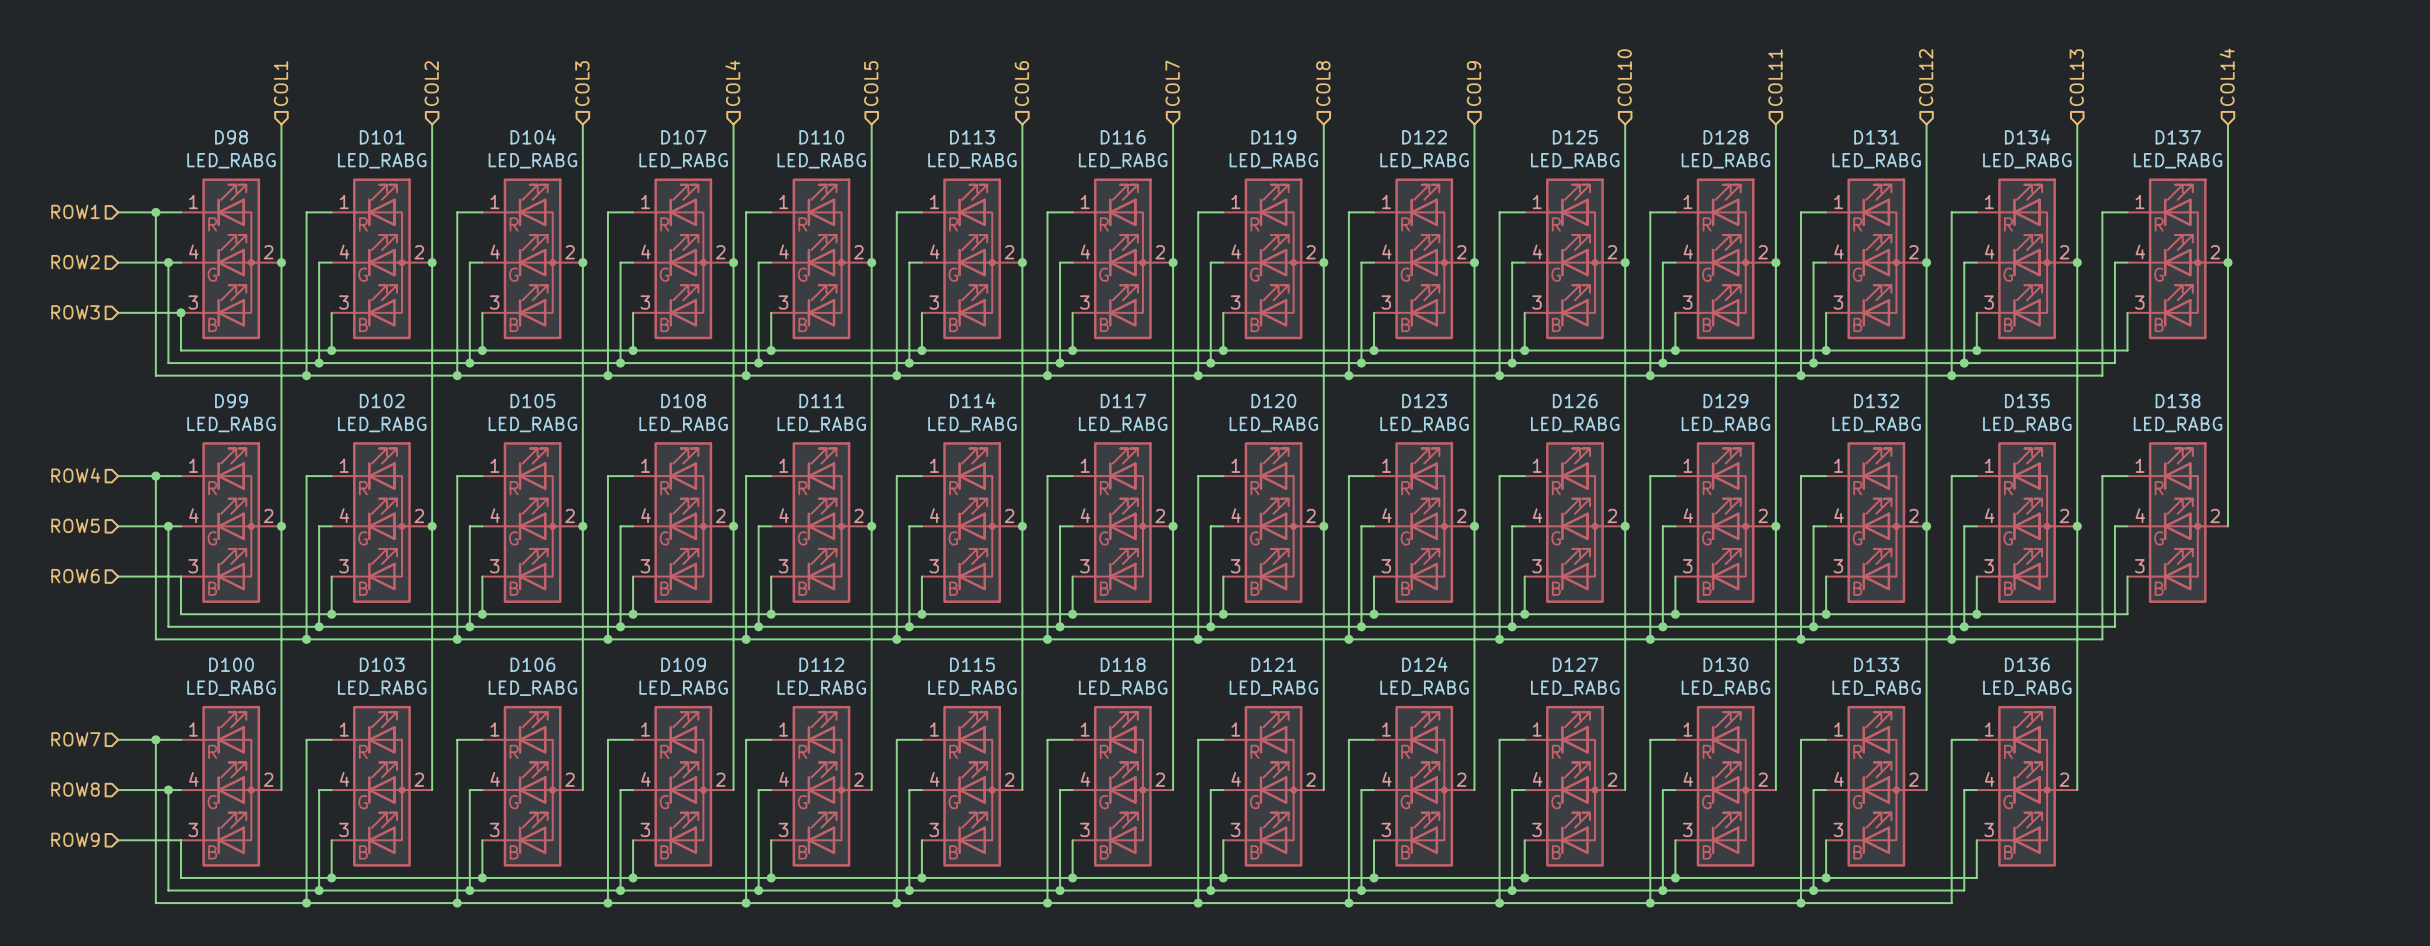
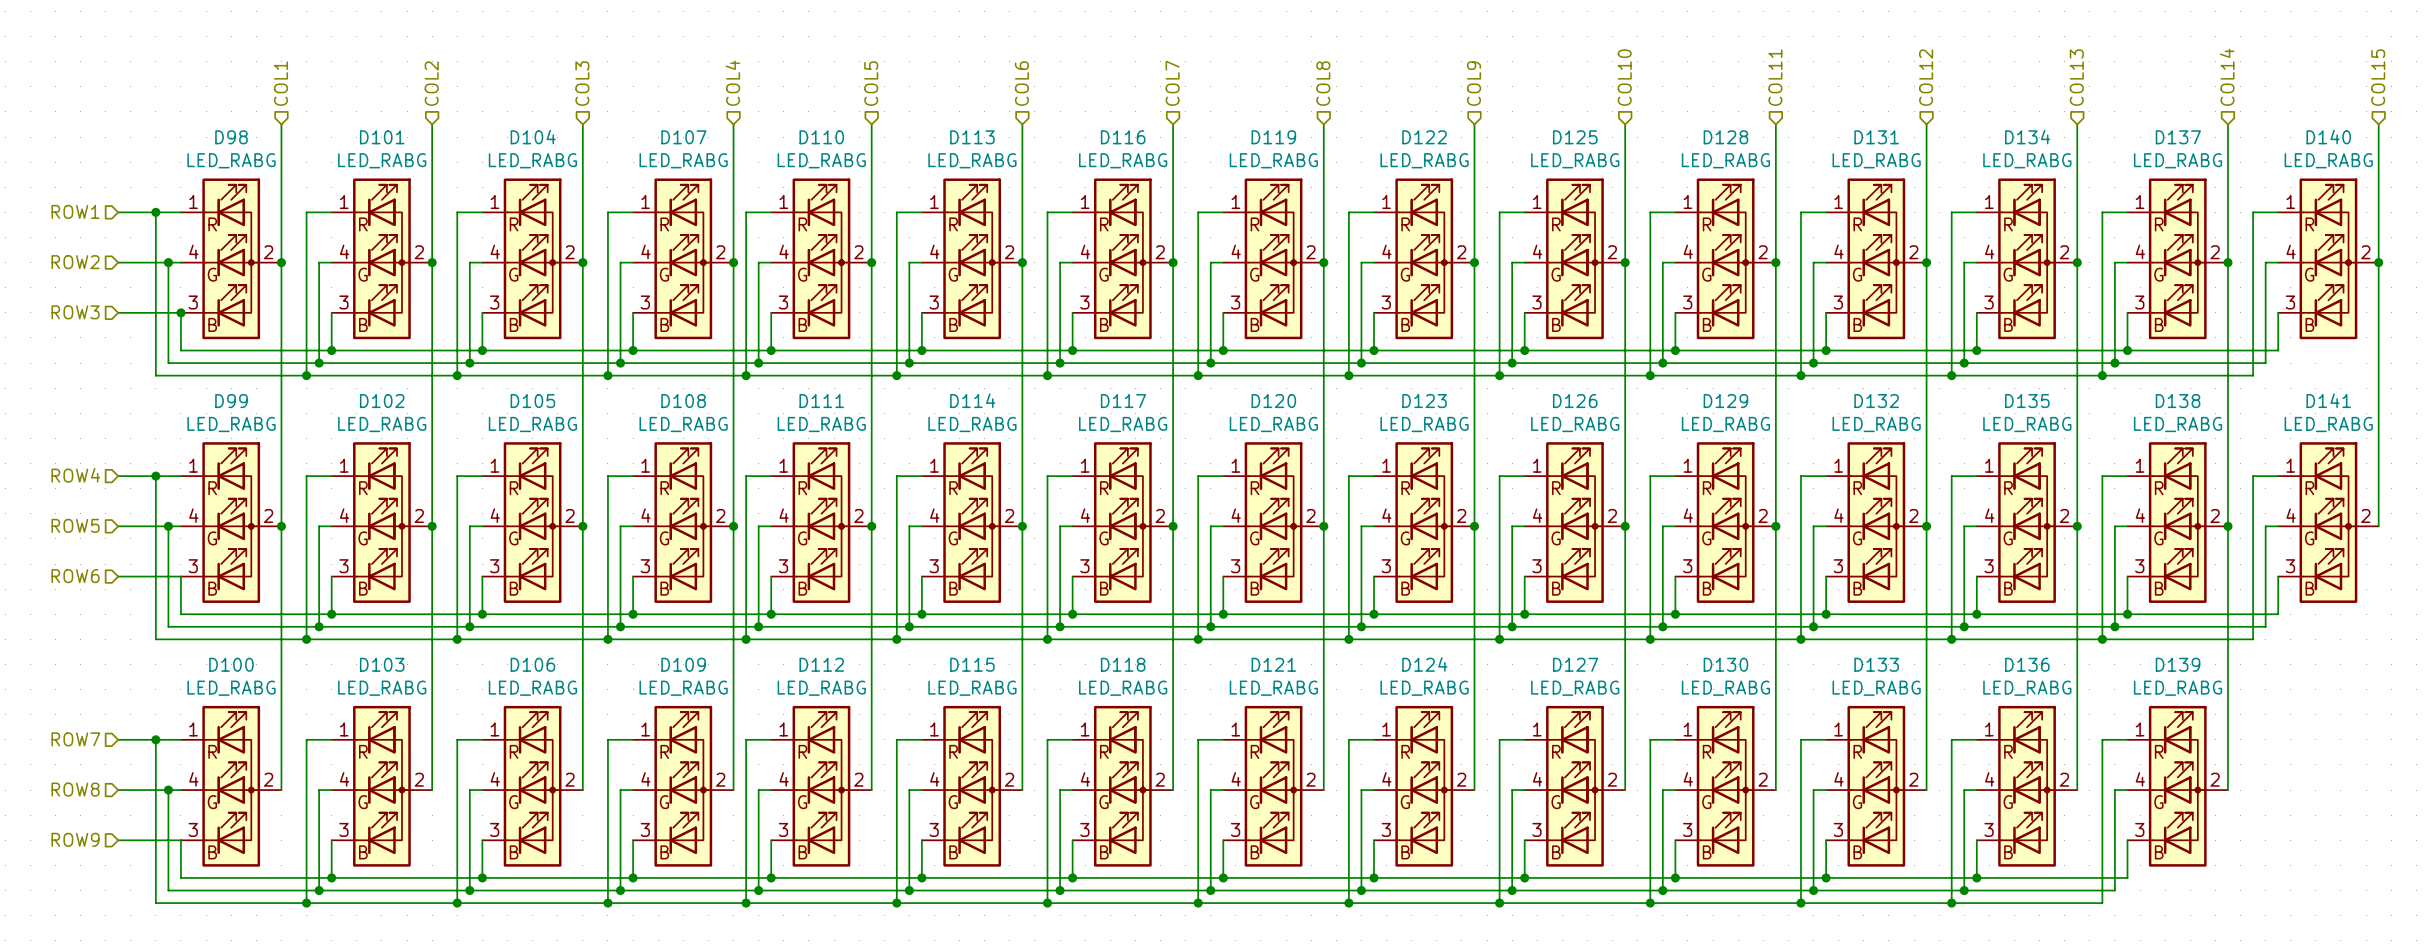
hierarchical label: none -> COL15 (2378, 77)
wire: none -> (2378, 124) (2378, 526)
wire: none -> (2278, 212) (2253, 212) (2253, 375) (2102, 375)
D140: none -> LED_RABG (2328, 258)
wire: none -> (2278, 262) (2265, 262) (2265, 363) (2114, 363)
junction: none -> (2378, 262)
wire: none -> (2278, 312) (2278, 350) (2127, 350)
junction: none -> (2127, 350)
junction: none -> (2114, 363)
junction: none -> (2102, 375)
wire: none -> (2278, 476) (2253, 476) (2253, 639) (2102, 639)
D141: none -> LED_RABG (2328, 522)
wire: none -> (2227, 526) (2227, 790)
junction: none -> (2227, 526)
wire: none -> (2278, 526) (2265, 526) (2265, 626) (2114, 626)
wire: none -> (2278, 576) (2278, 614) (2127, 614)
junction: none -> (2127, 614)
junction: none -> (2114, 626)
junction: none -> (2102, 639)
wire: none -> (2127, 739) (2102, 739) (2102, 903) (1951, 903)
D139: none -> LED_RABG (2177, 786)
wire: none -> (2127, 790) (2114, 790) (2114, 890) (1964, 890)
wire: none -> (2127, 840) (2127, 877) (1976, 877)
junction: none -> (1976, 877)
junction: none -> (1964, 890)
junction: none -> (1951, 903)

